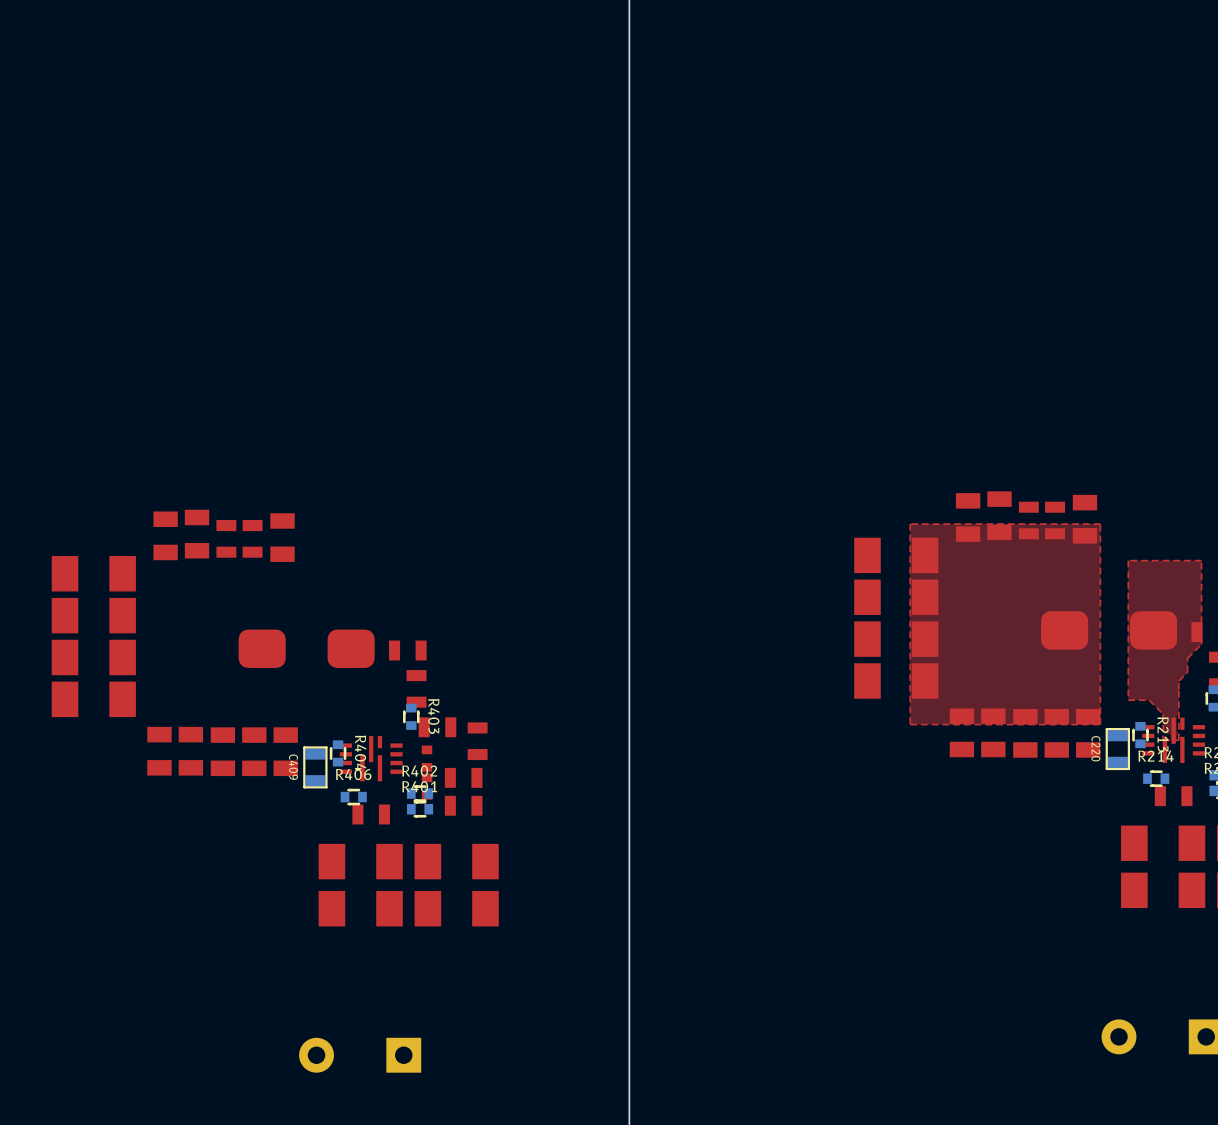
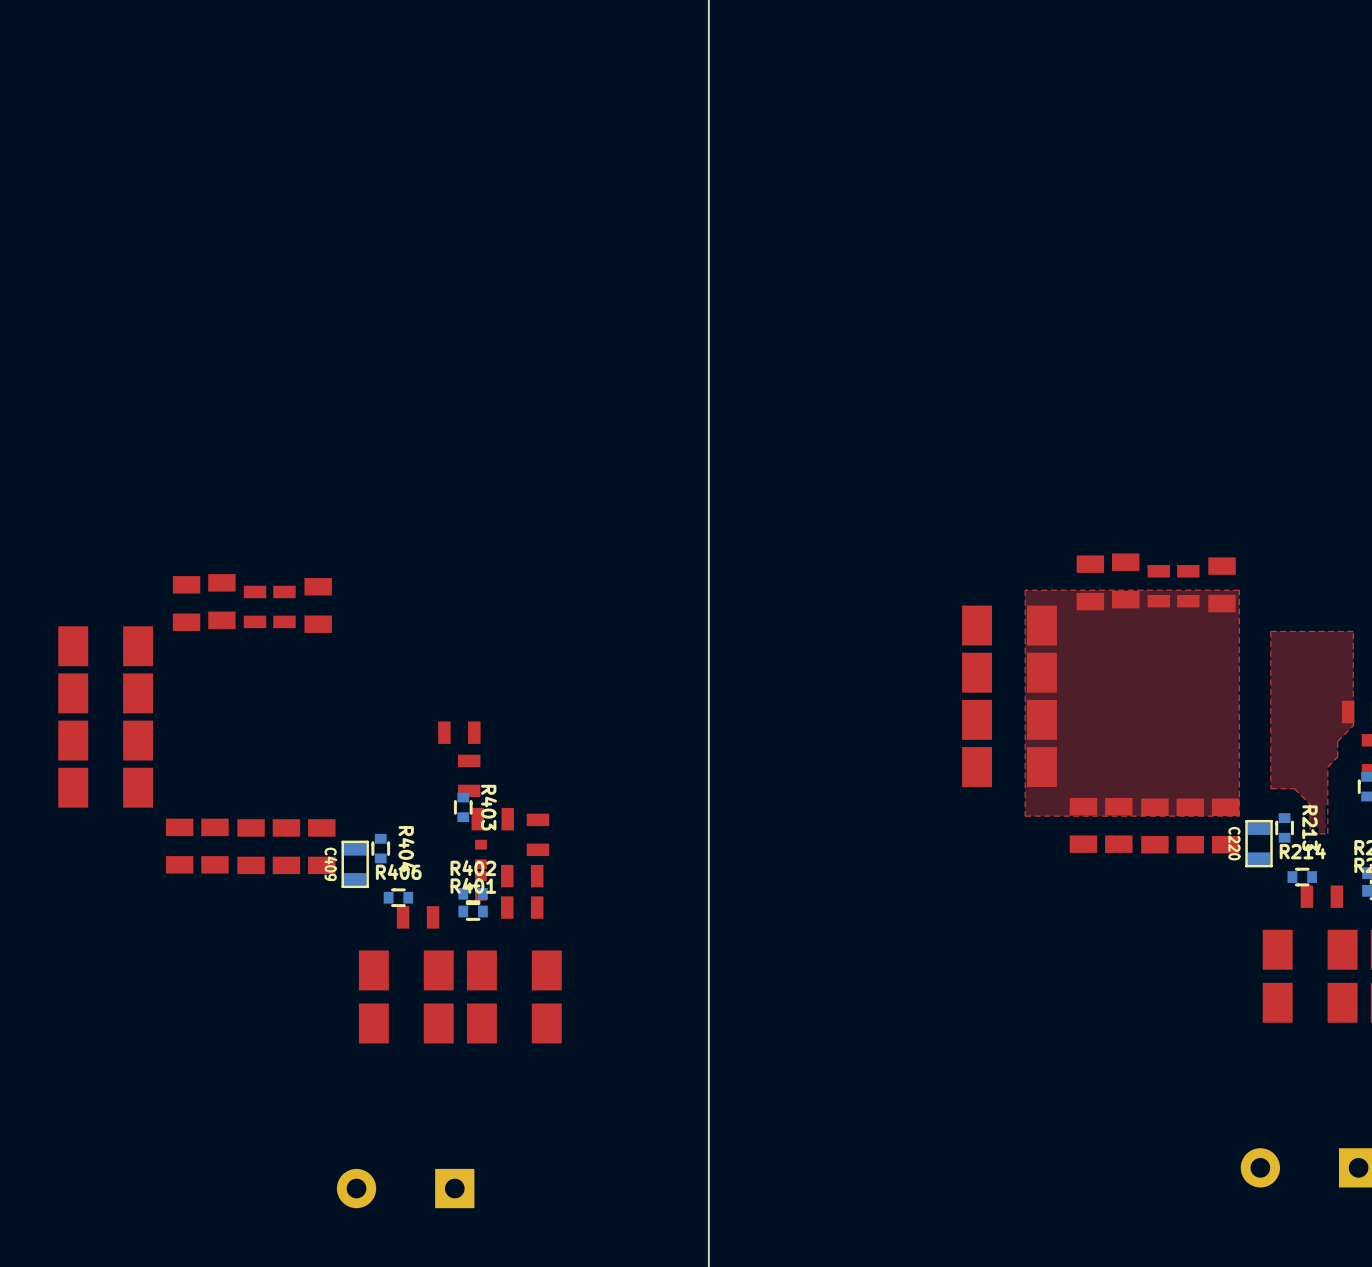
part: (1109, 630) -> none
part: (306, 648) -> none
part: (1173, 740) -> none
part: (371, 758) -> none

